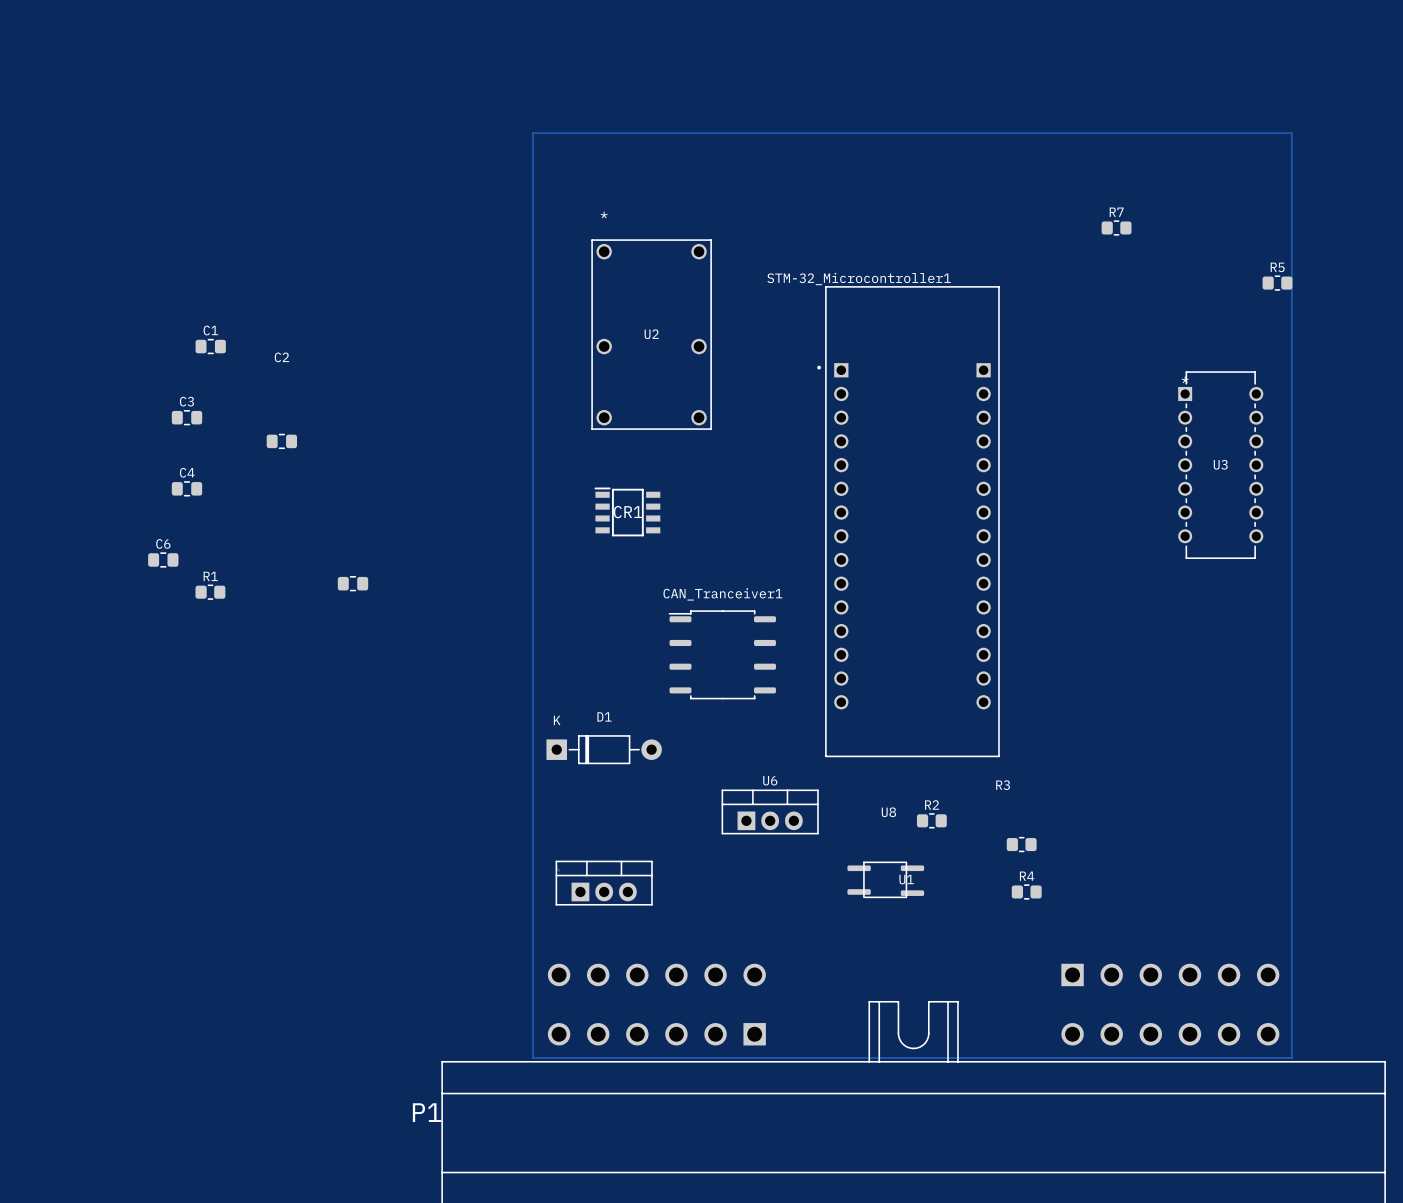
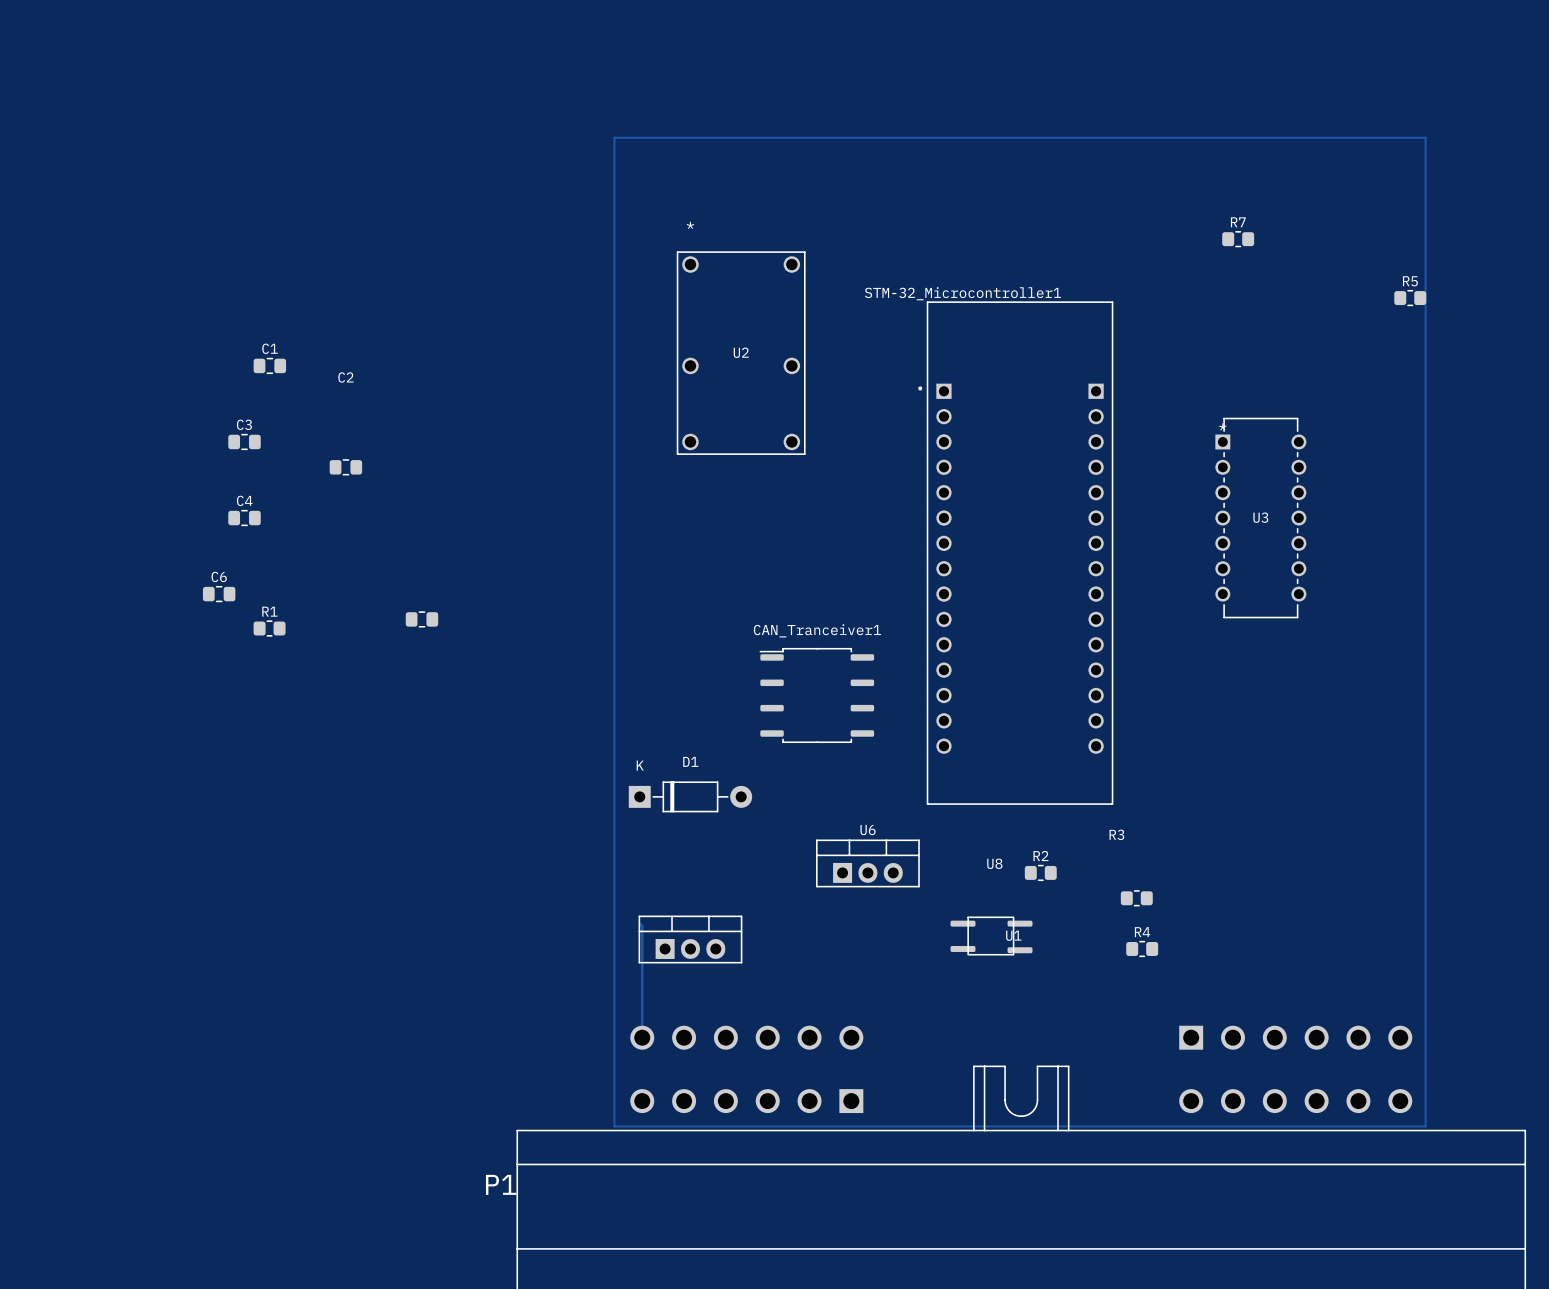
U3 position: (1220, 465) -> (1260, 518)
CR1: (627, 511) -> none
track: none -> (642, 926) (642, 1037)

